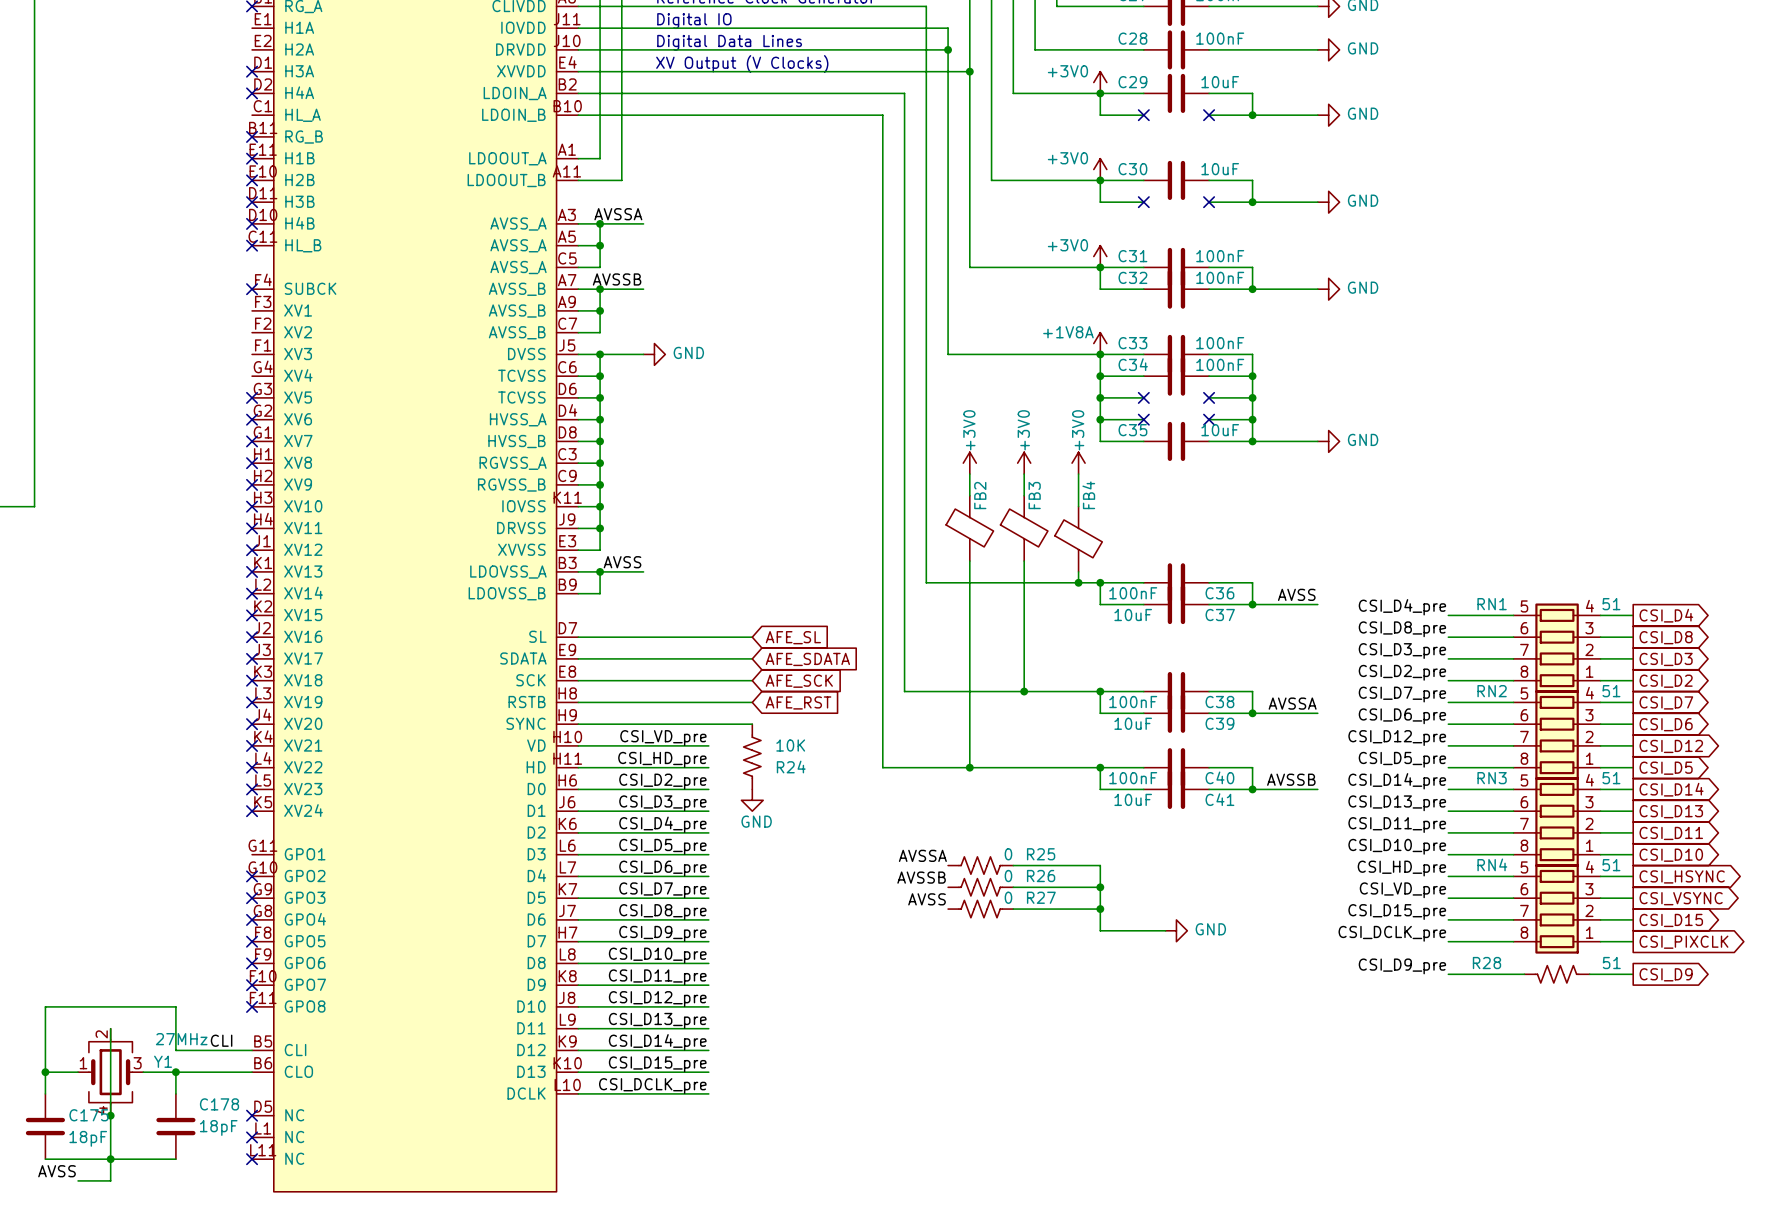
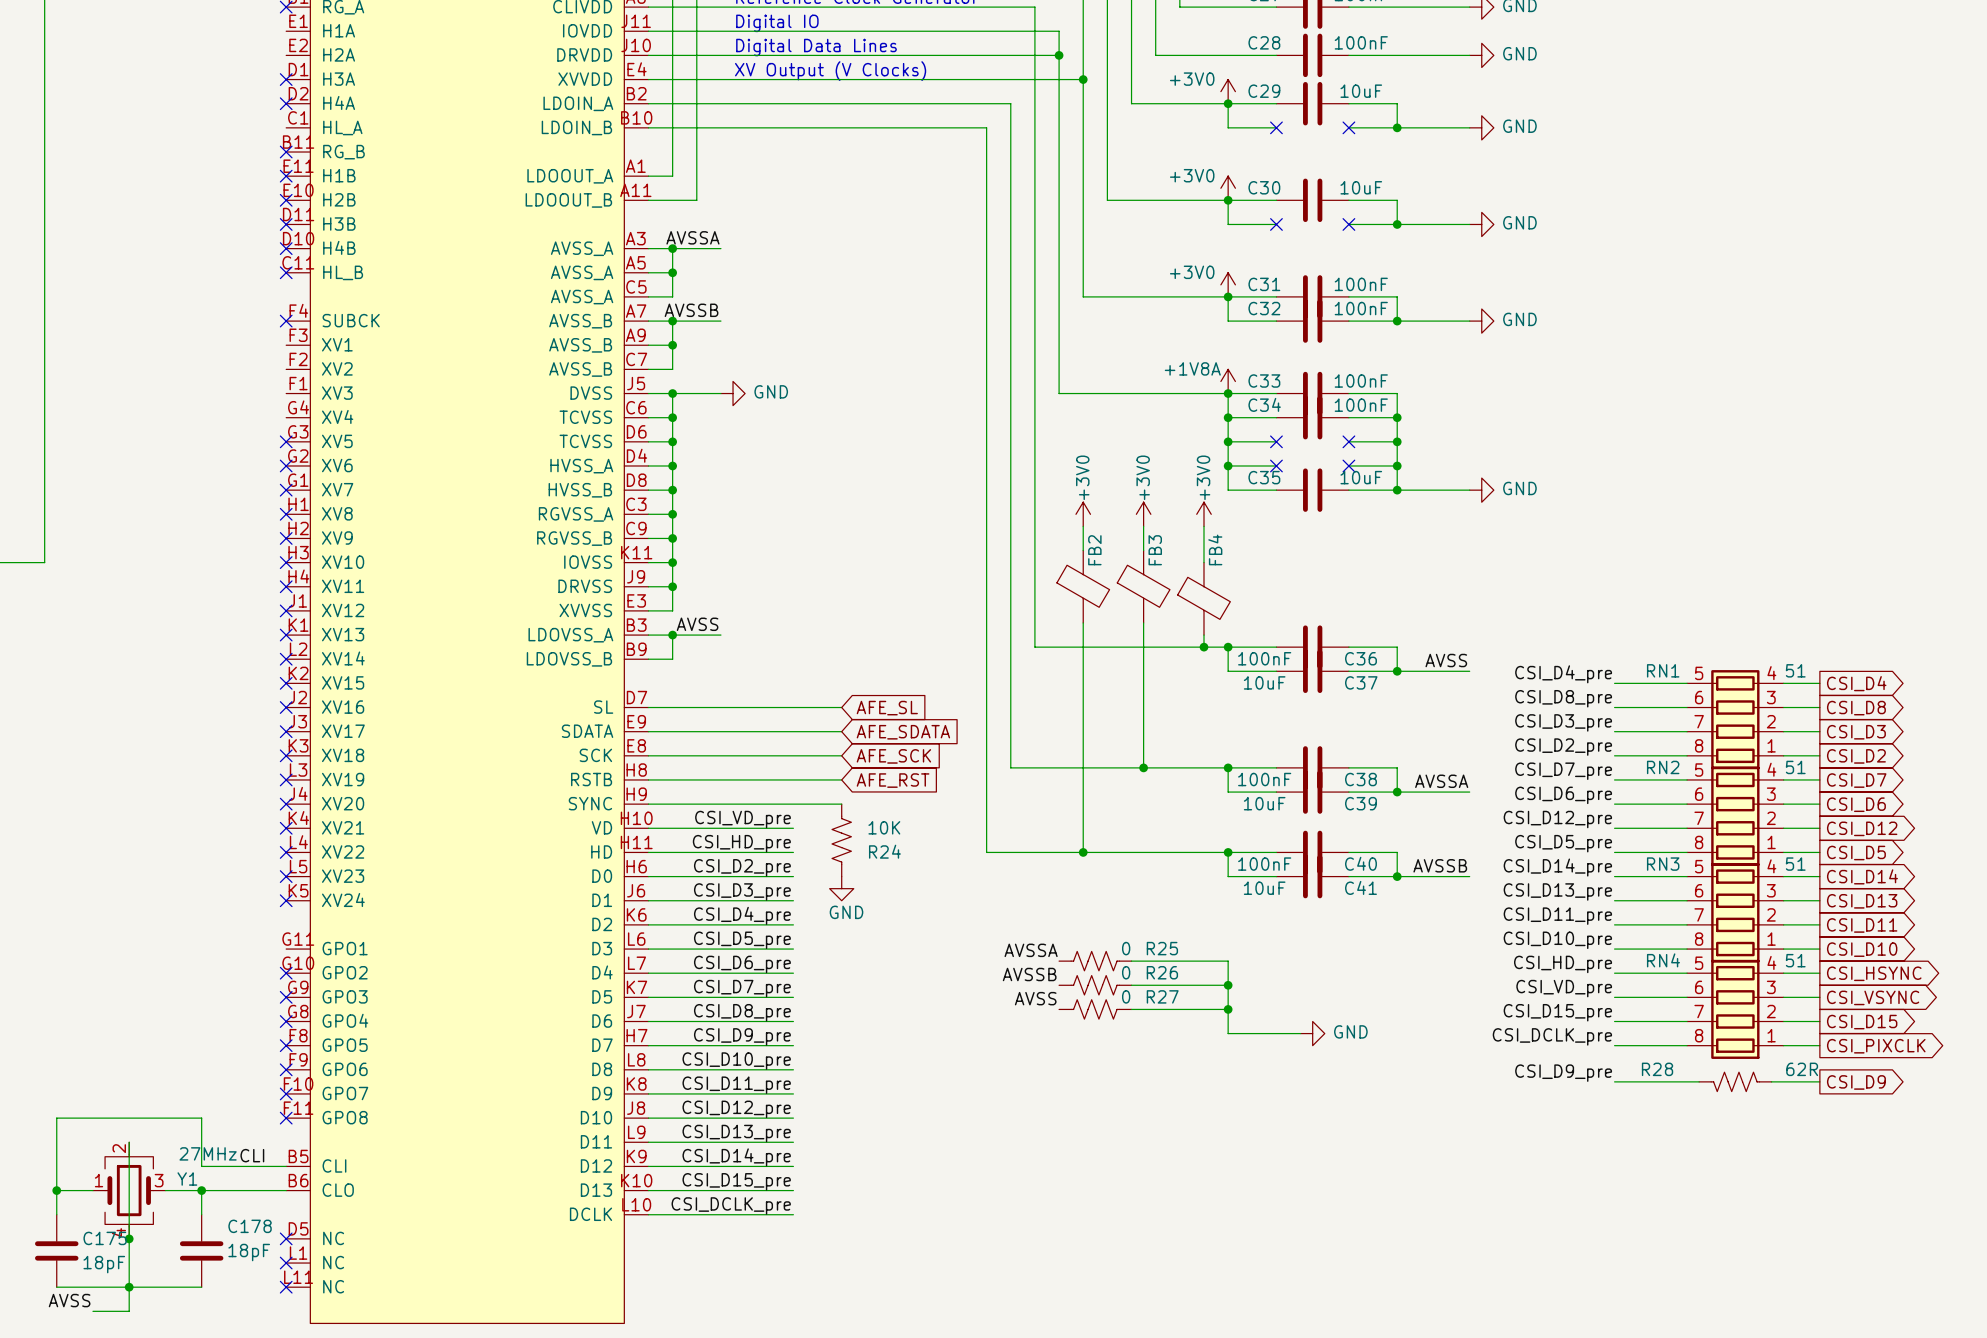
R28 value: 51 (1611, 963) -> 62R (1802, 1069)

